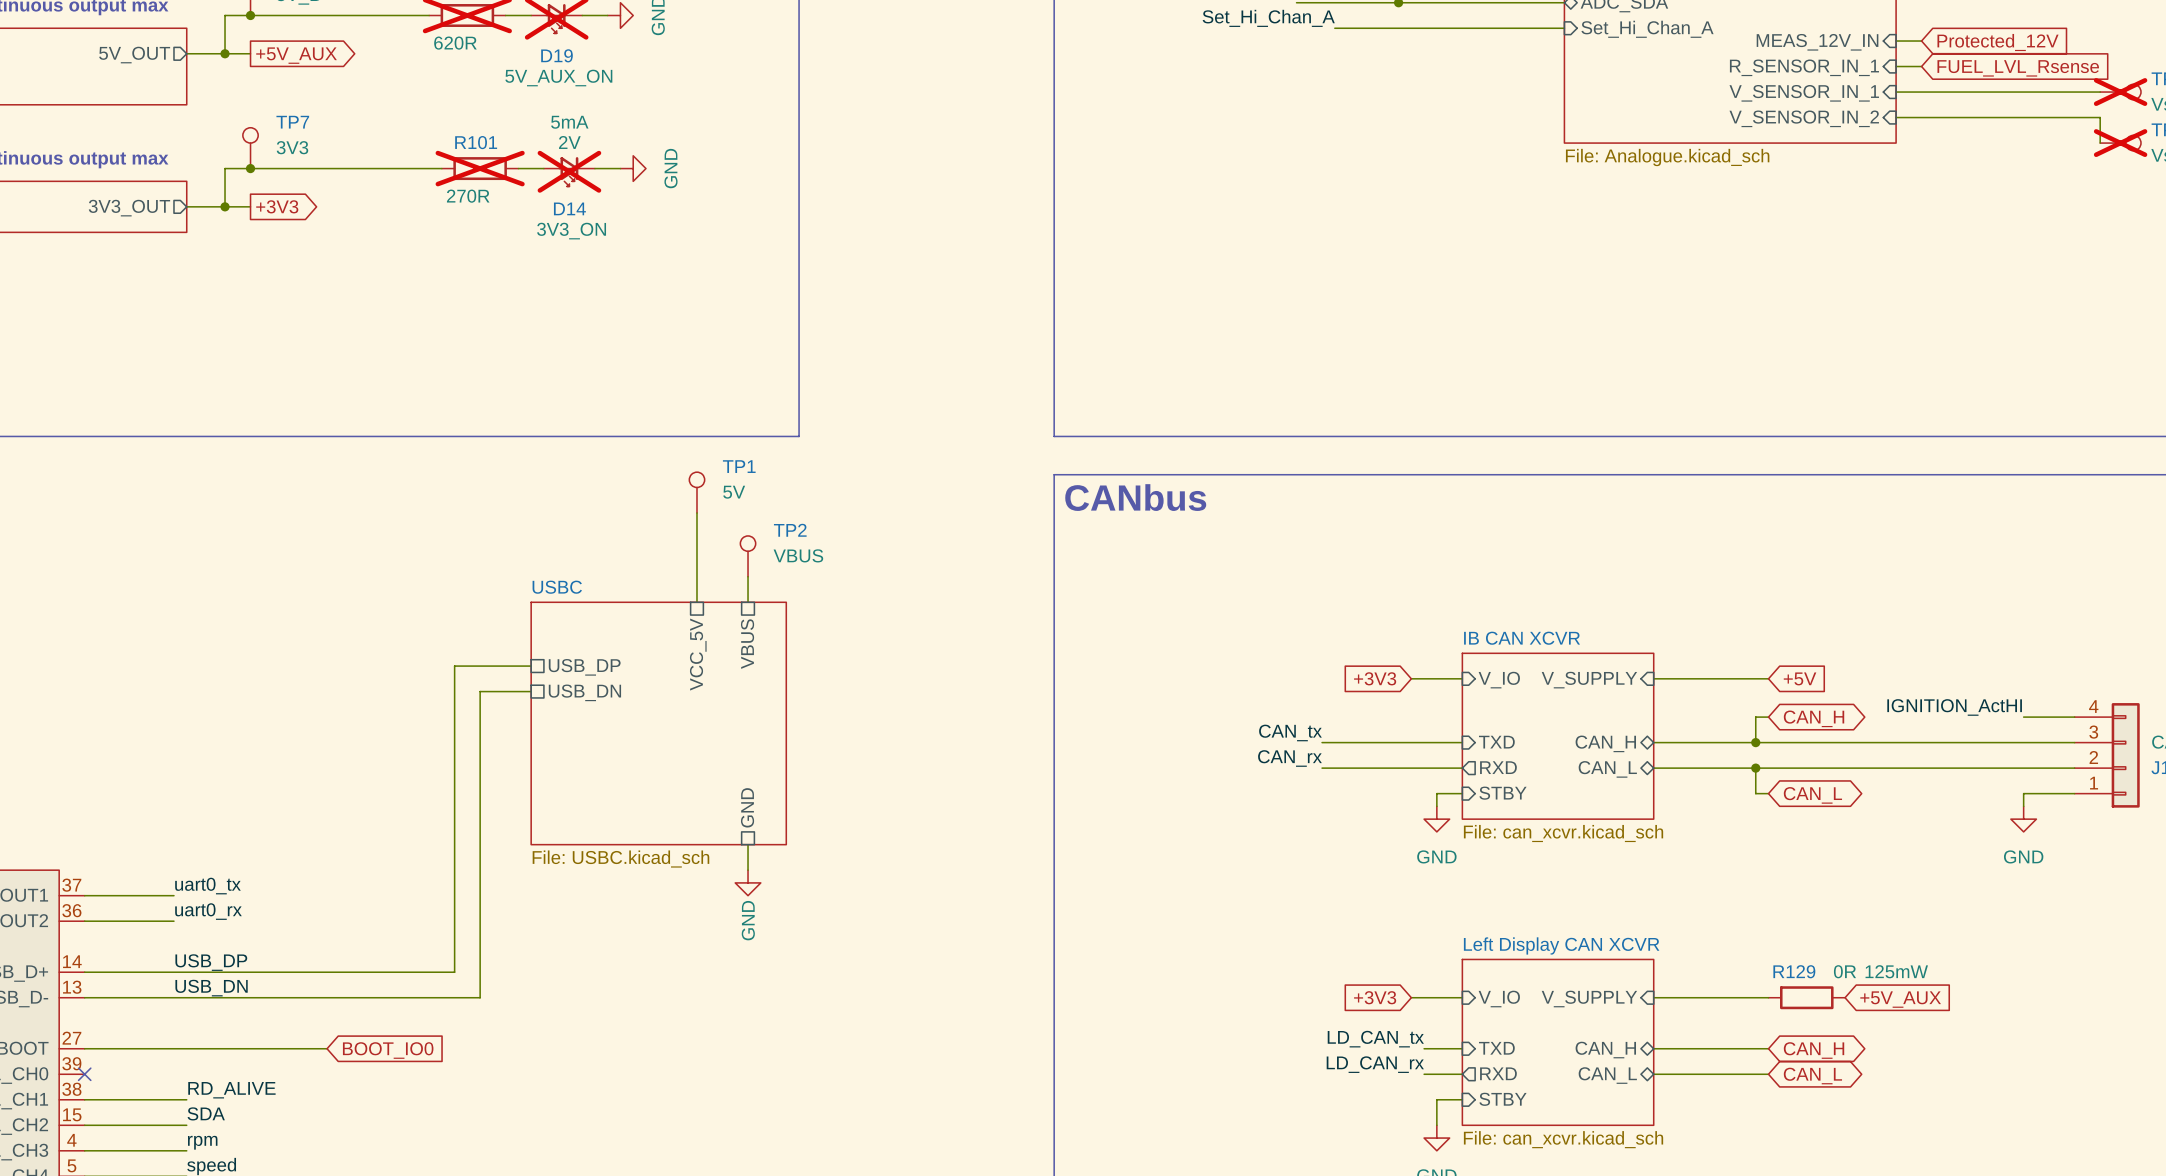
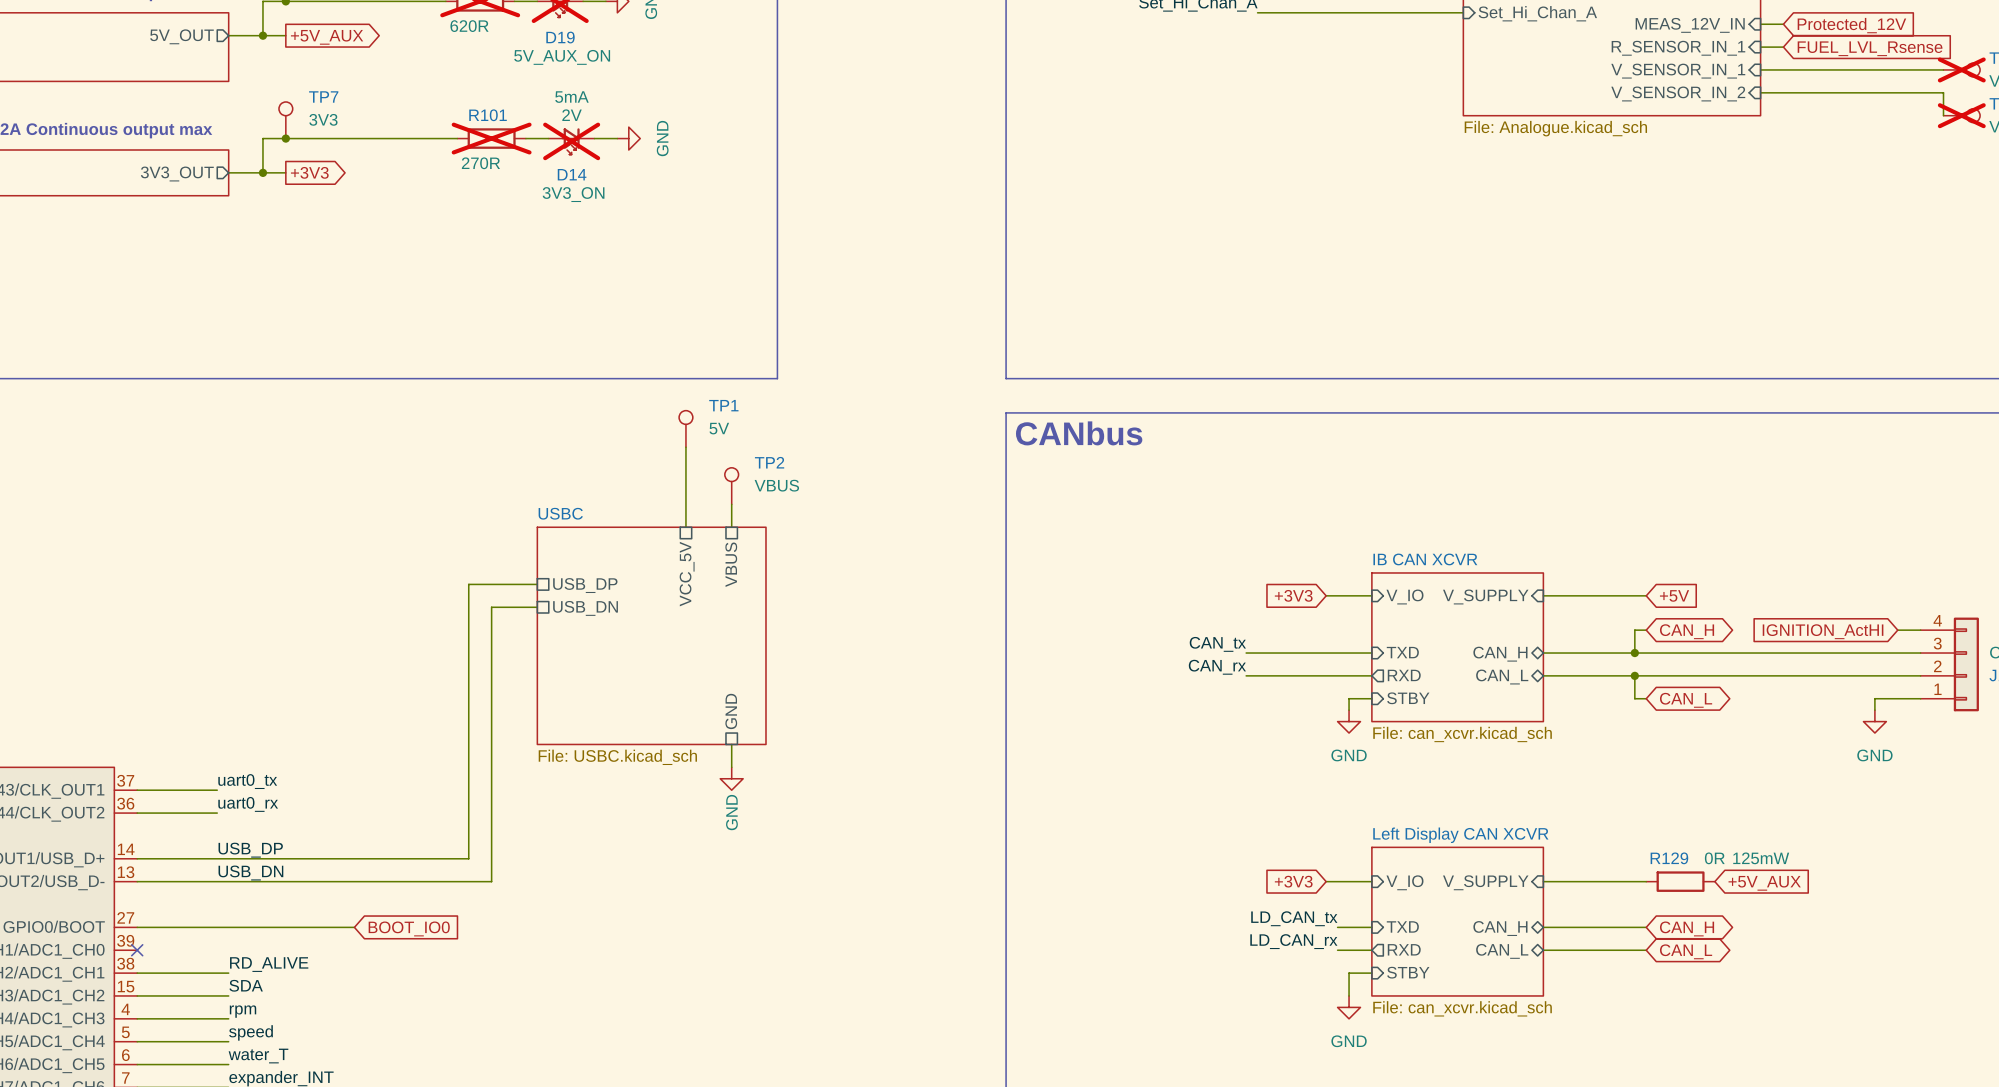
label: IGNITION_ActHI (1954, 707) -> none
wire: (2023, 717) (2049, 717) -> none
global label: none -> IGNITION_ActHI (1823, 631)

